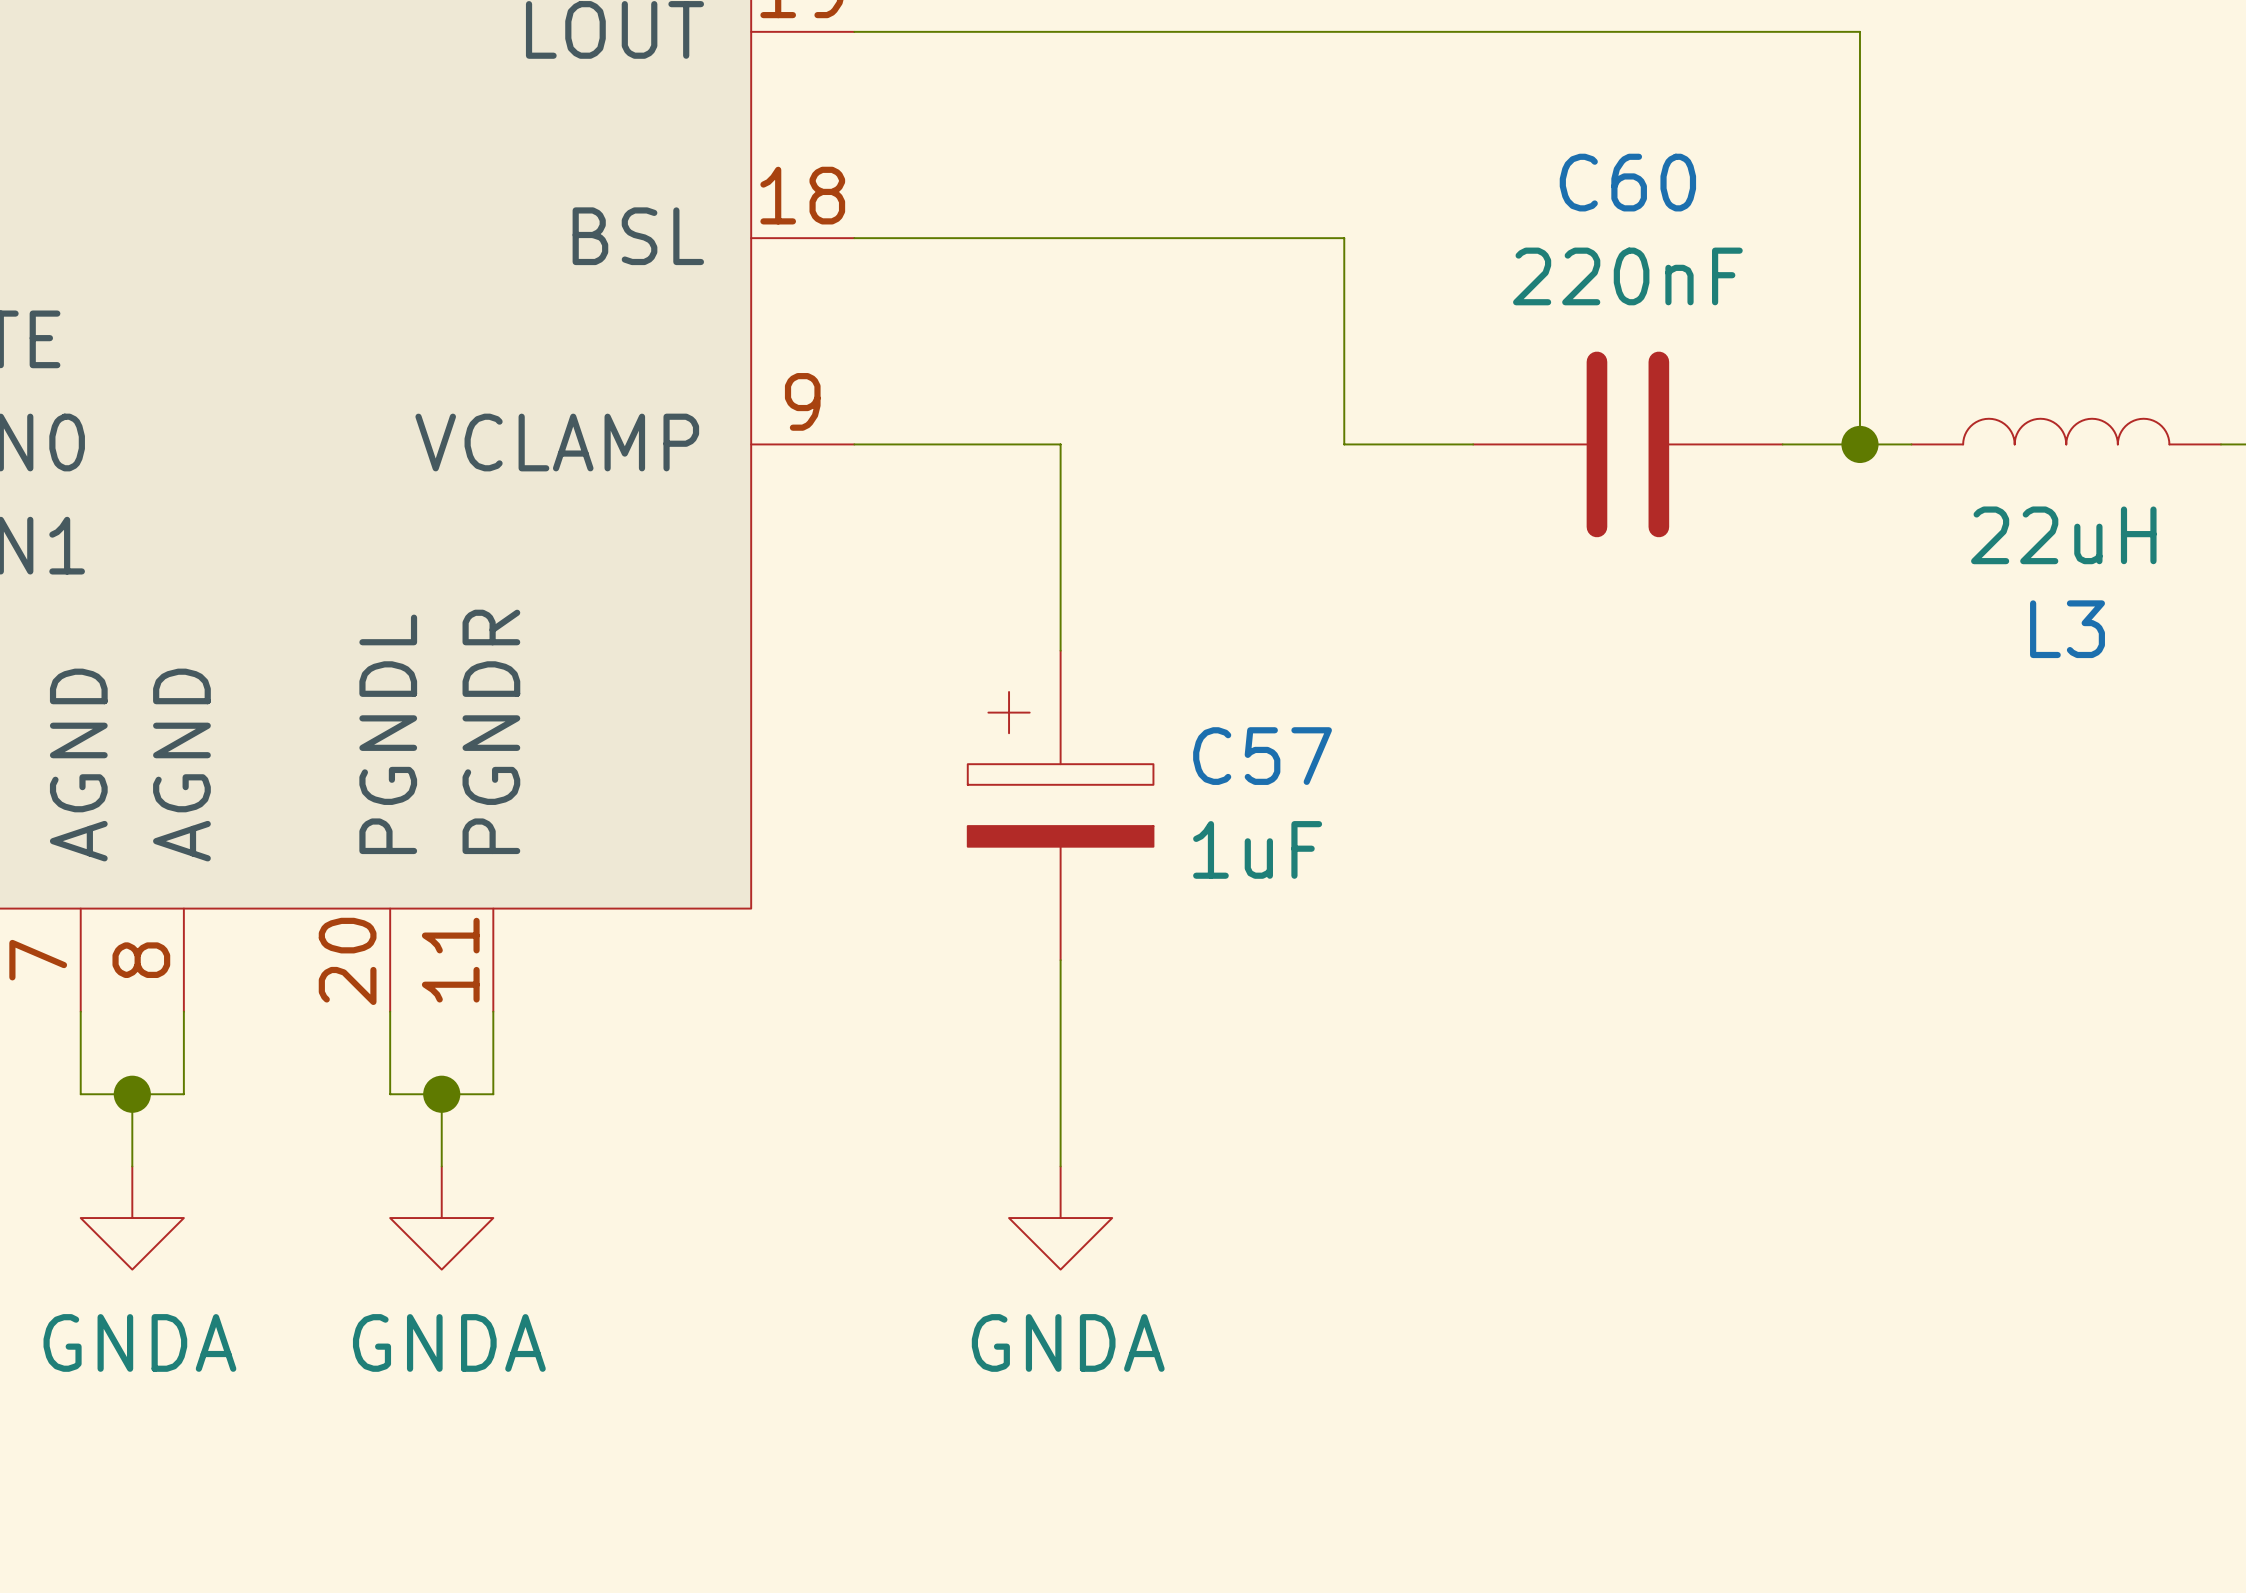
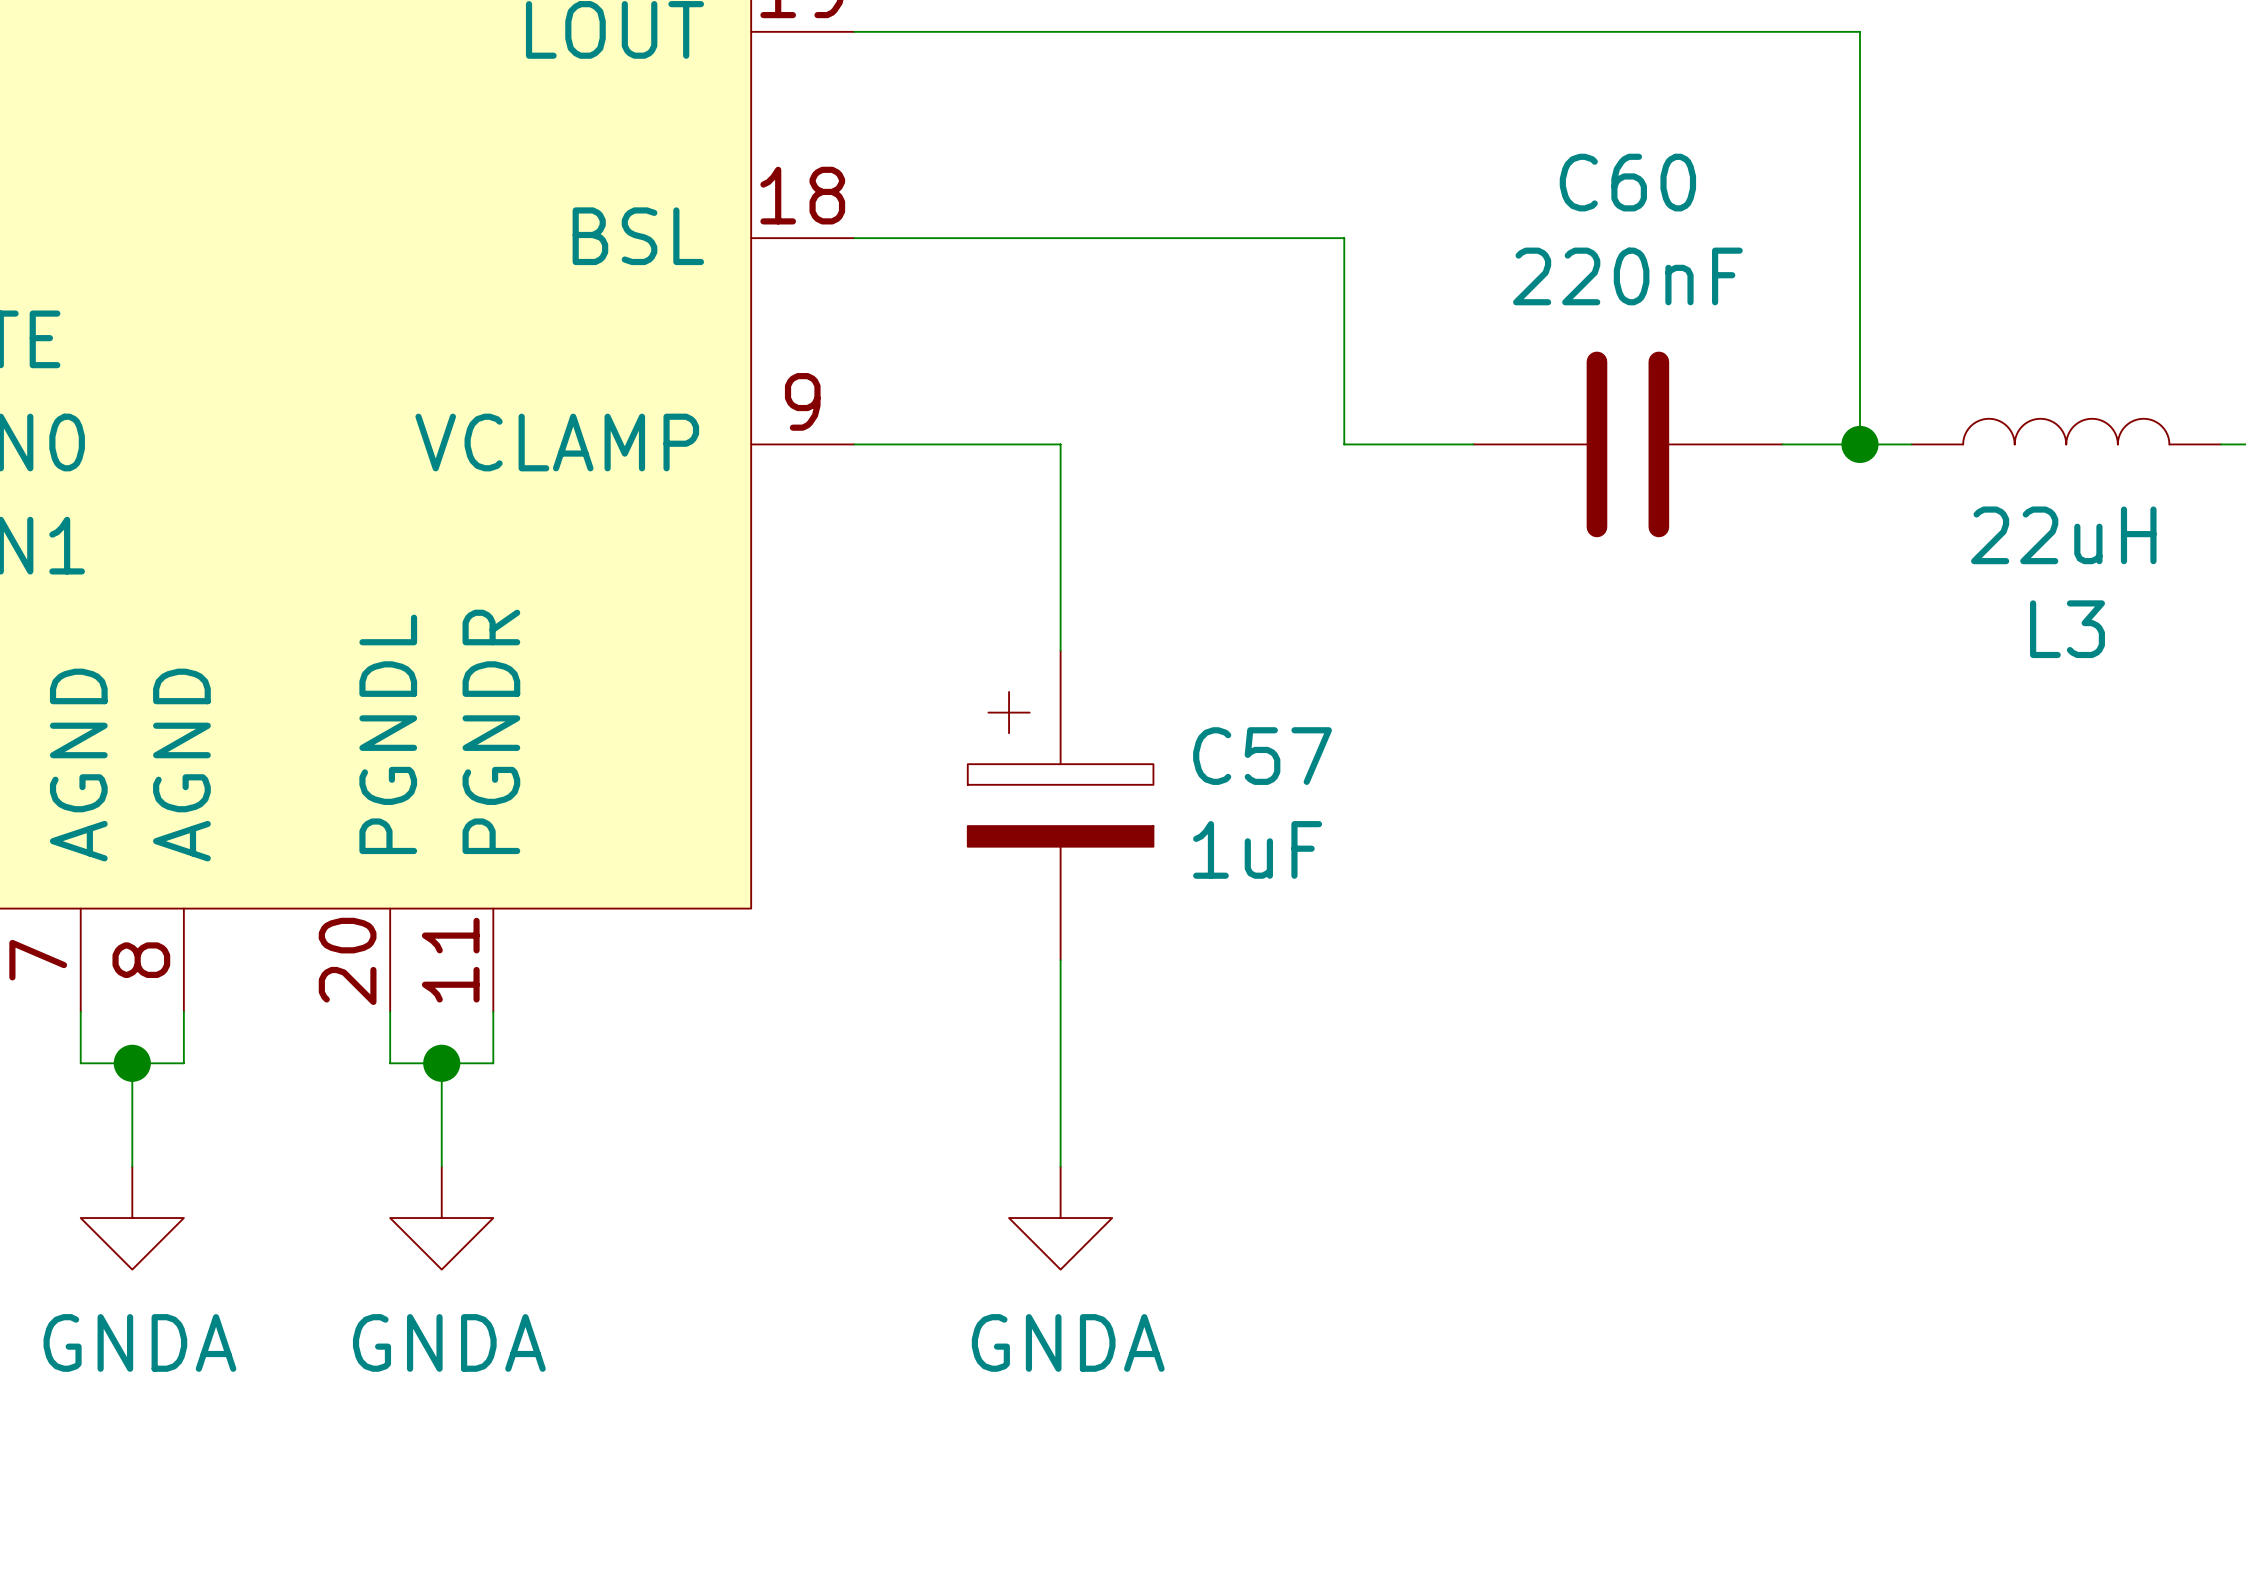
wire: (80, 1063) (80, 1094) (183, 1094) (183, 1063) -> (80, 1063) (183, 1063)
wire: (390, 1063) (390, 1094) (493, 1094) (493, 1063) -> (390, 1063) (493, 1063)
junction position: (132, 1094) -> (132, 1063)
junction position: (441, 1094) -> (441, 1063)

